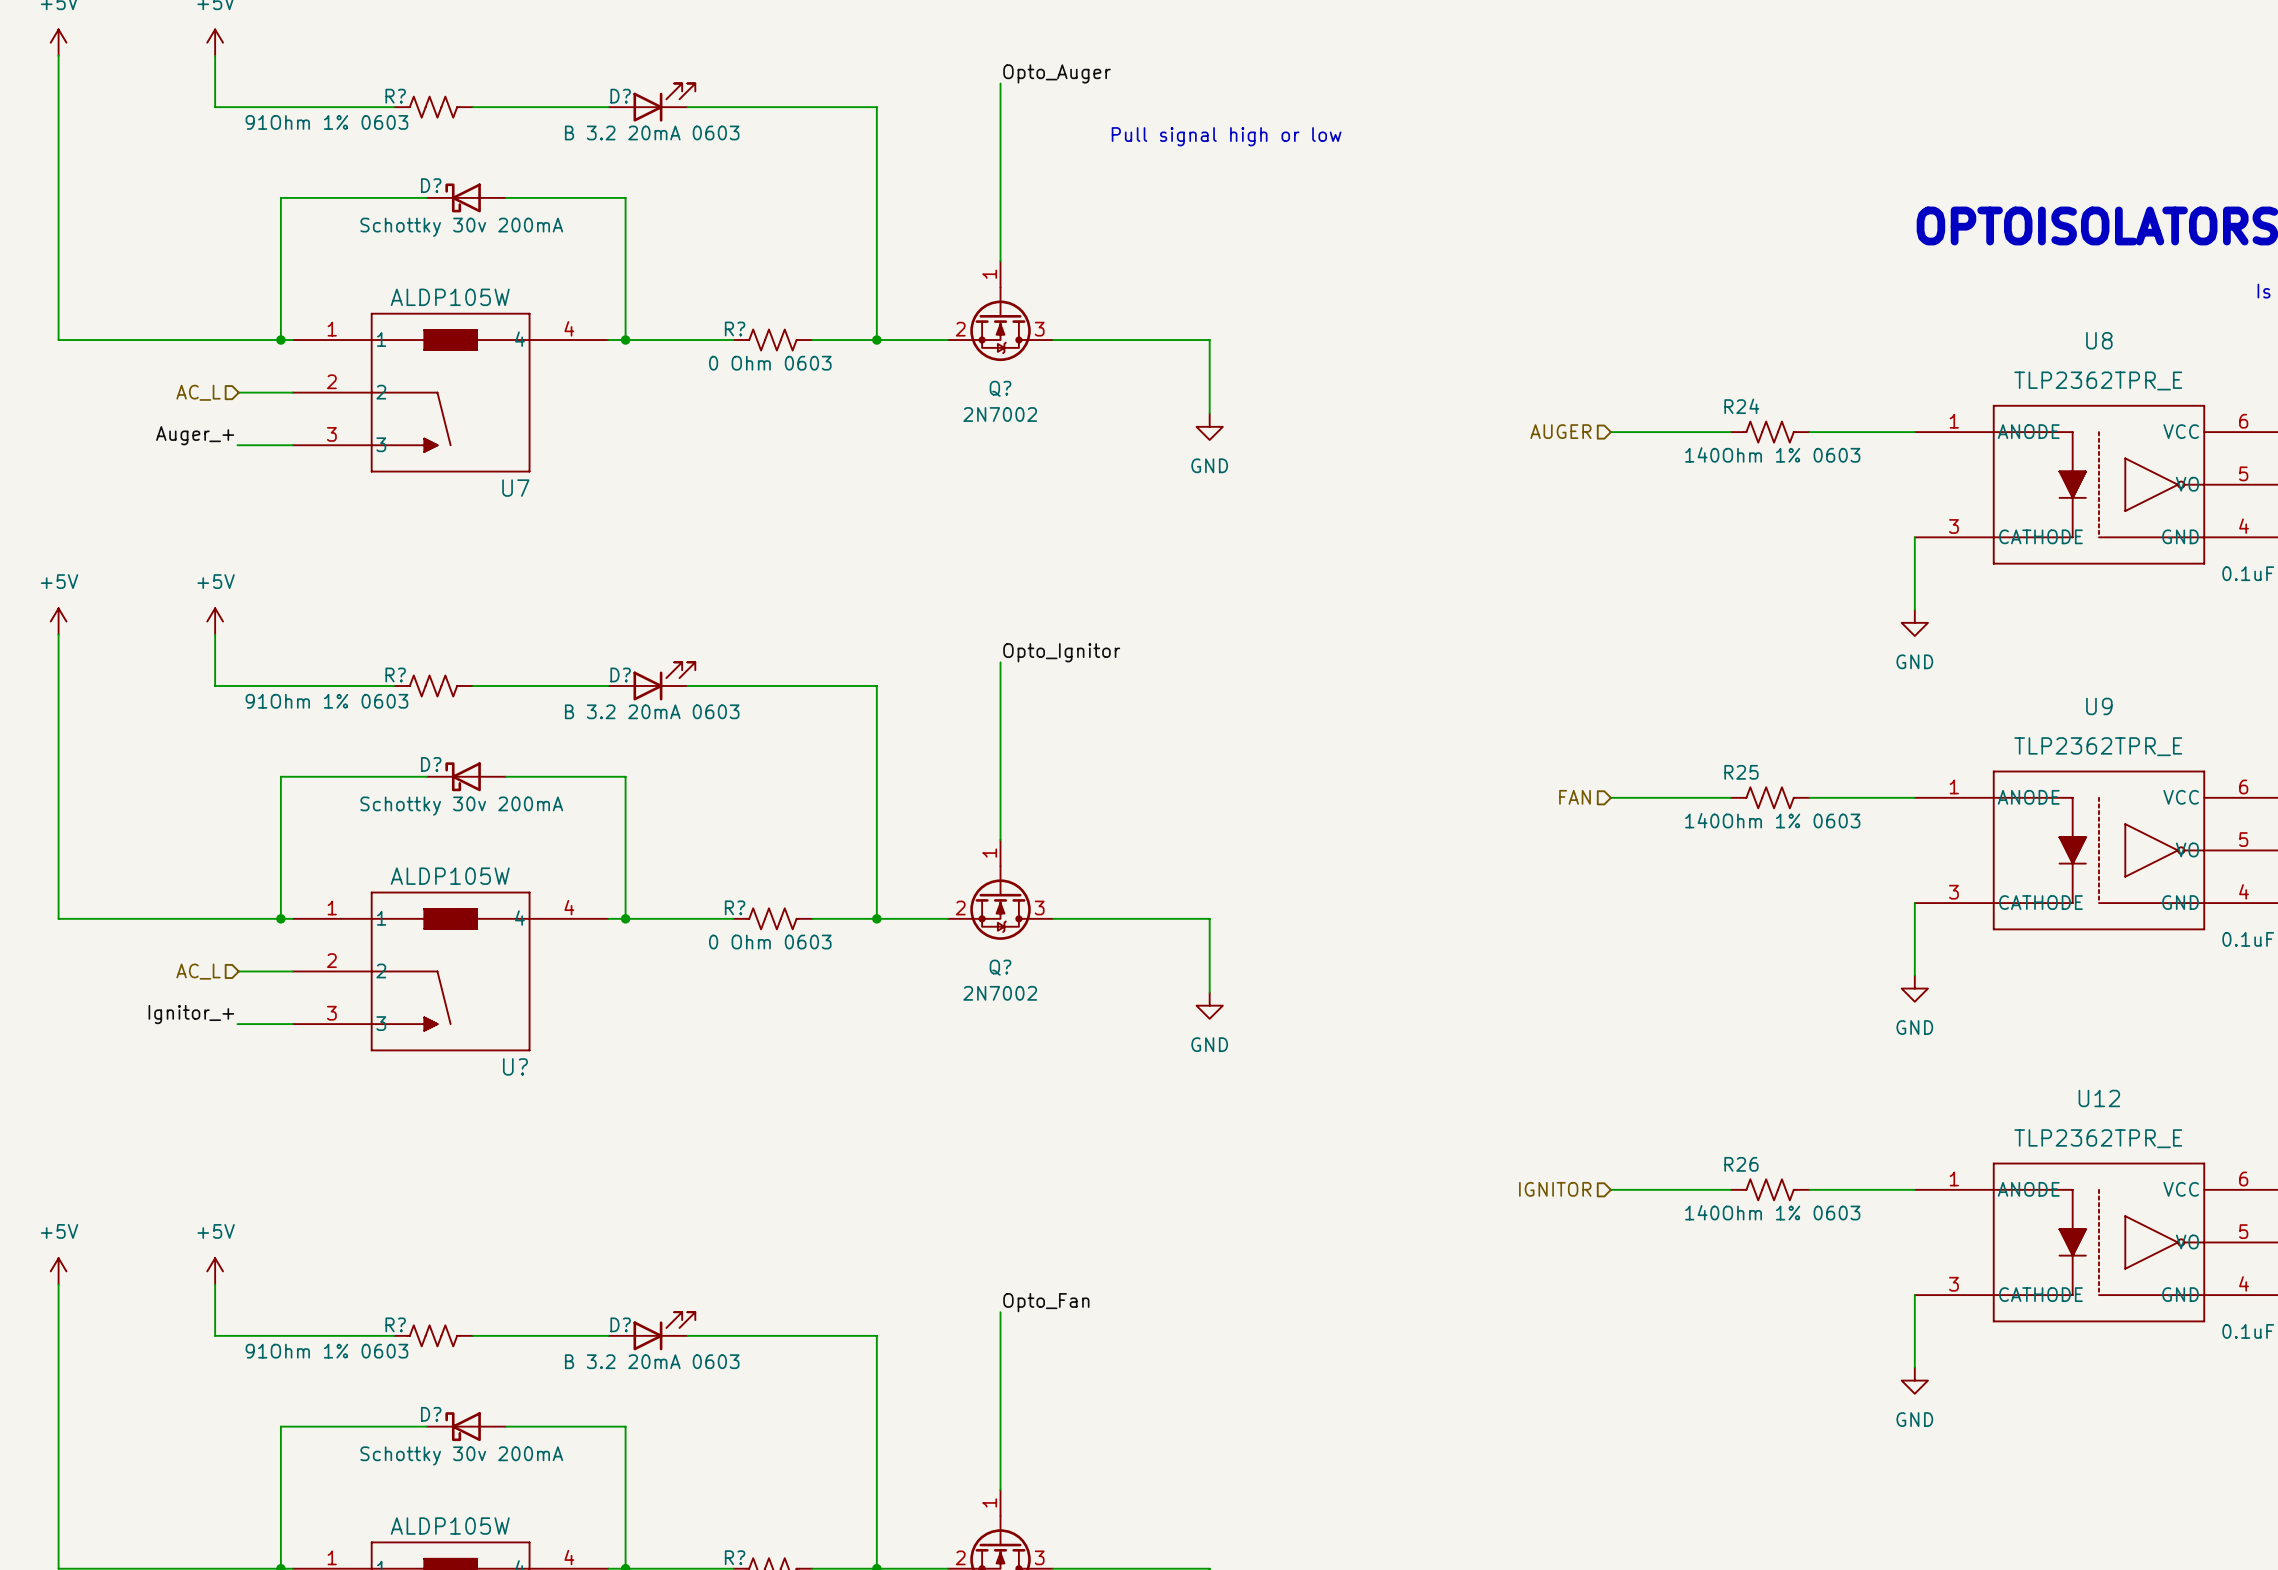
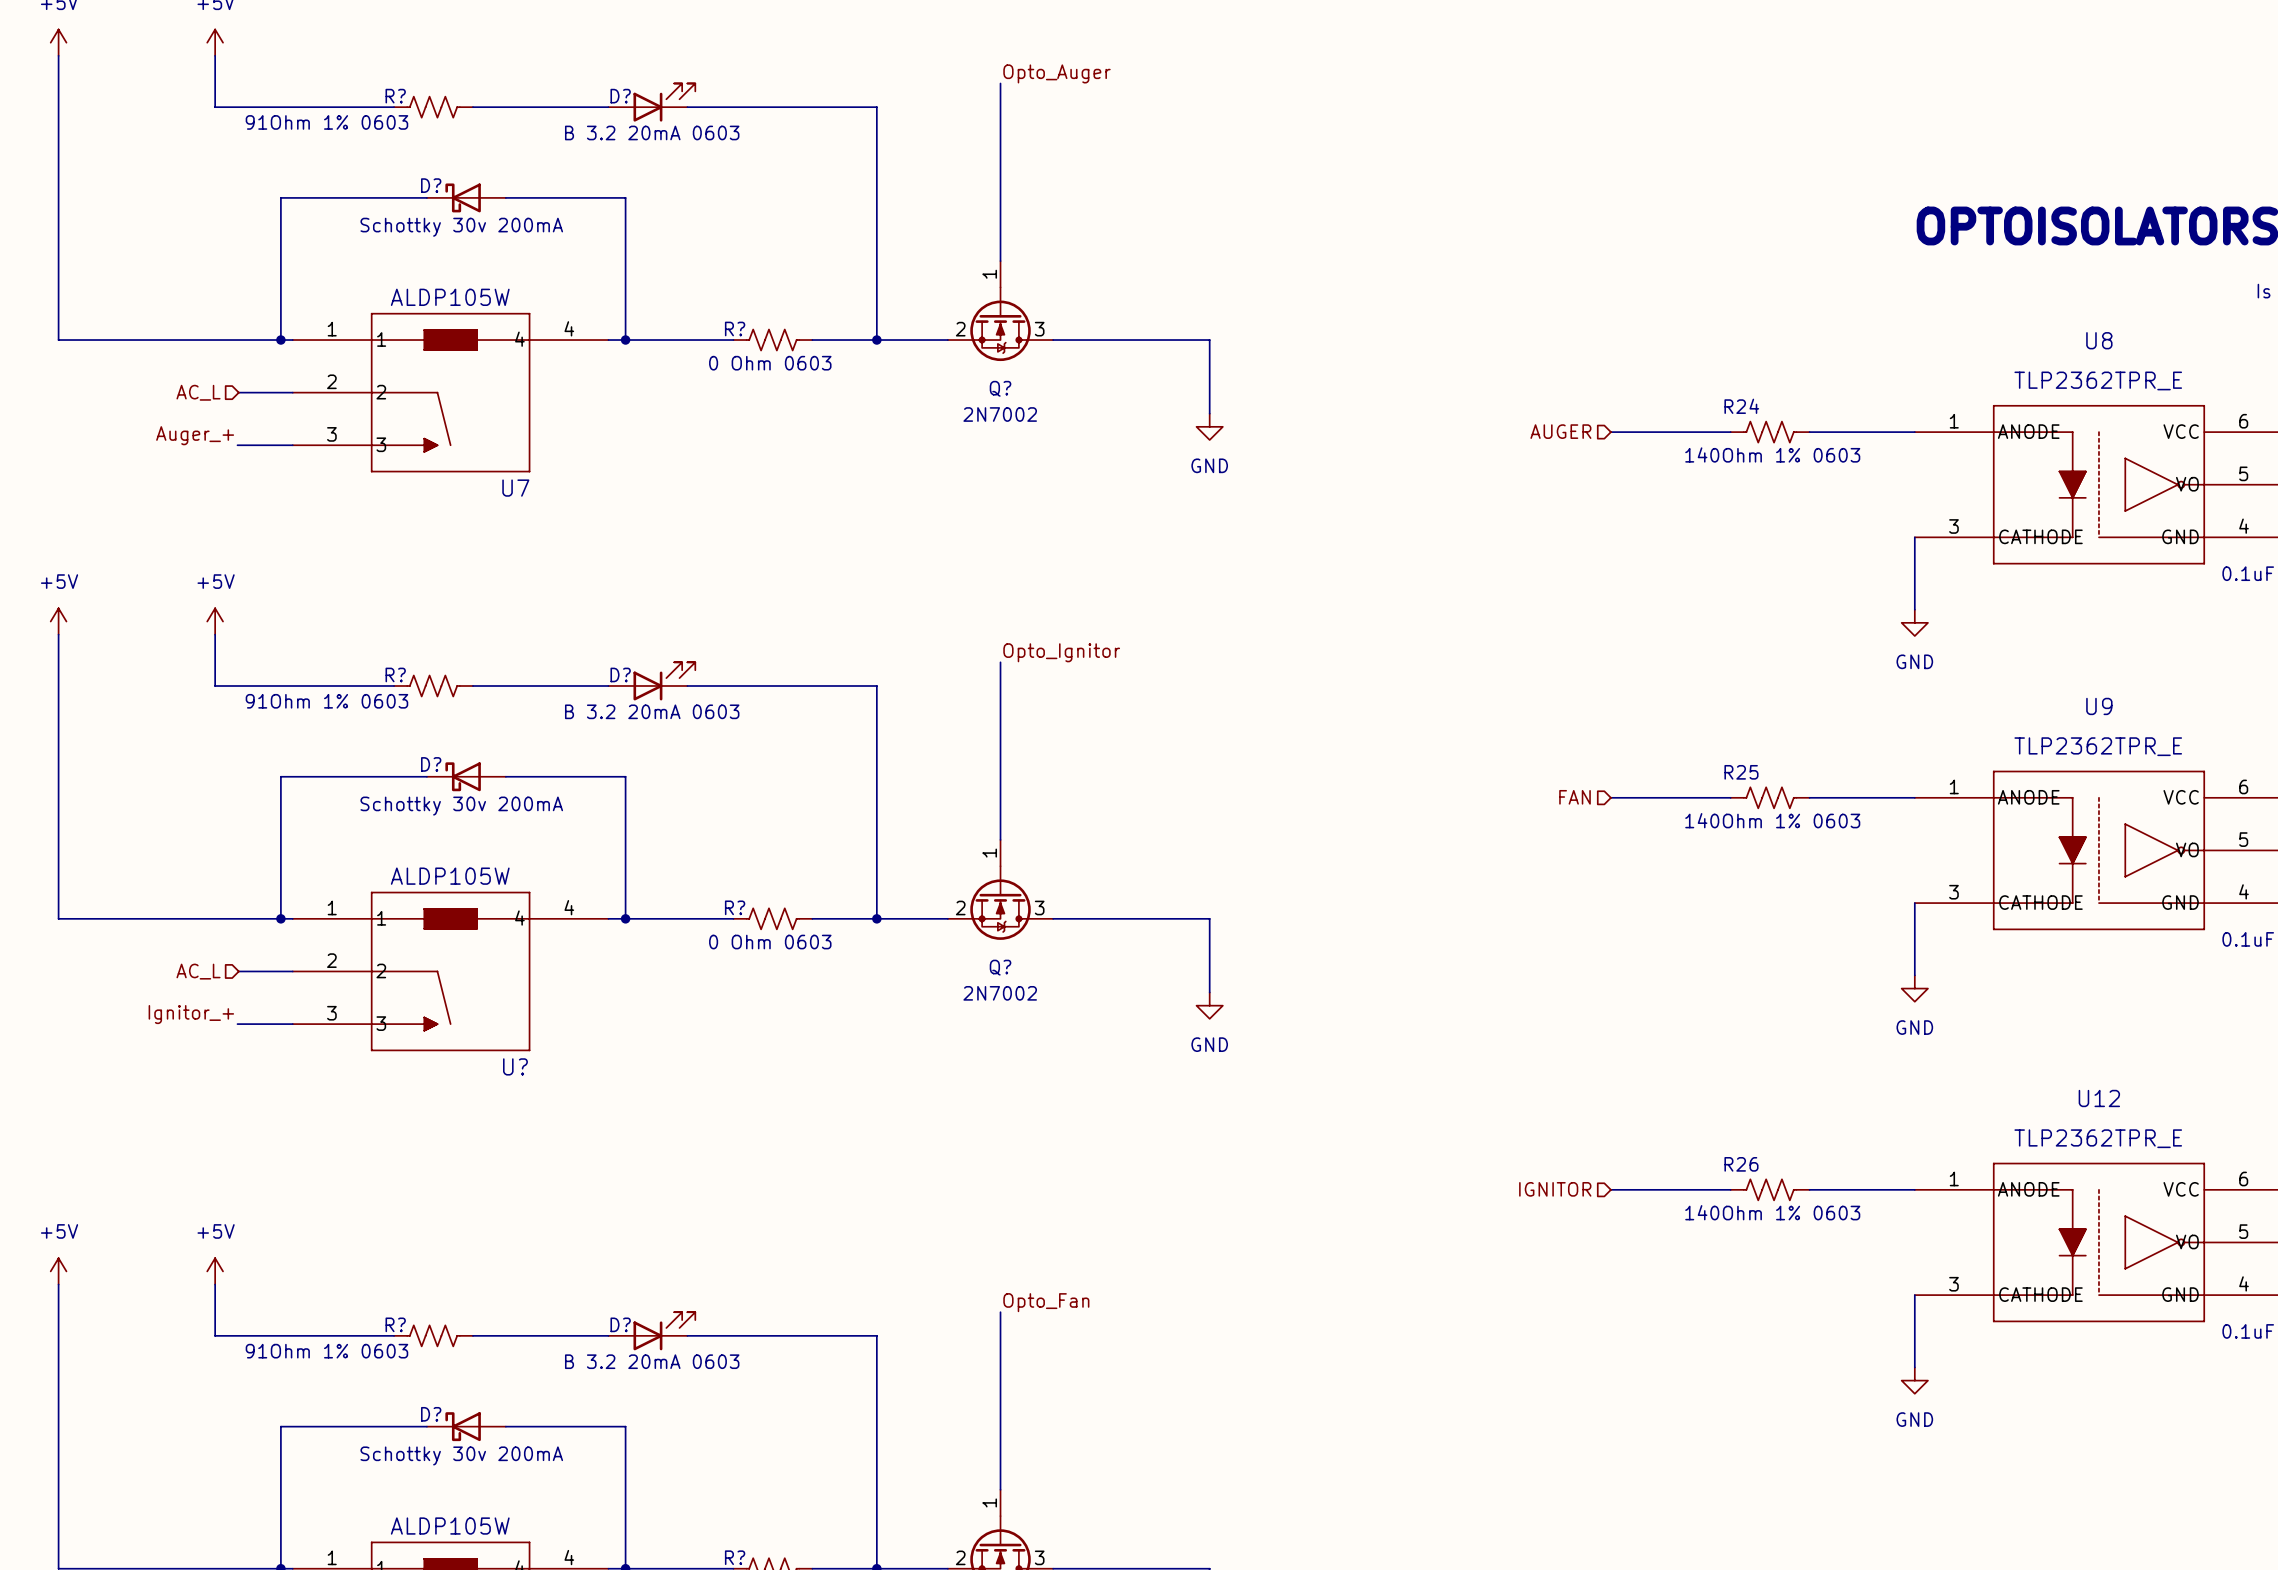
text: Pull signal high or low (1226, 136) -> none

